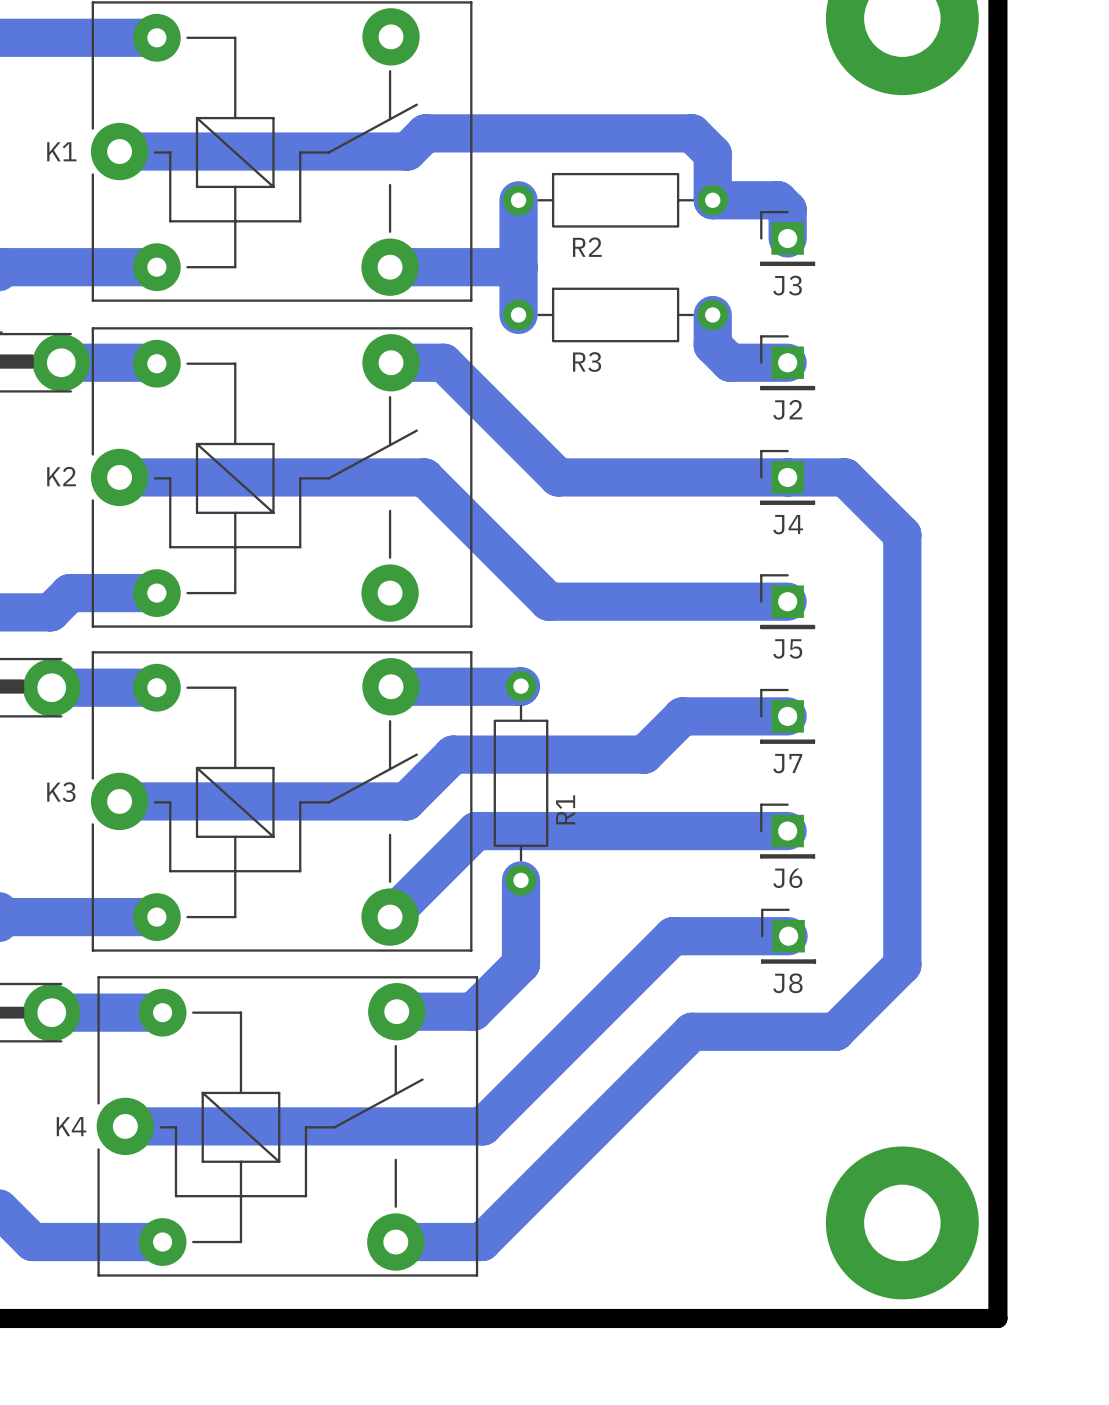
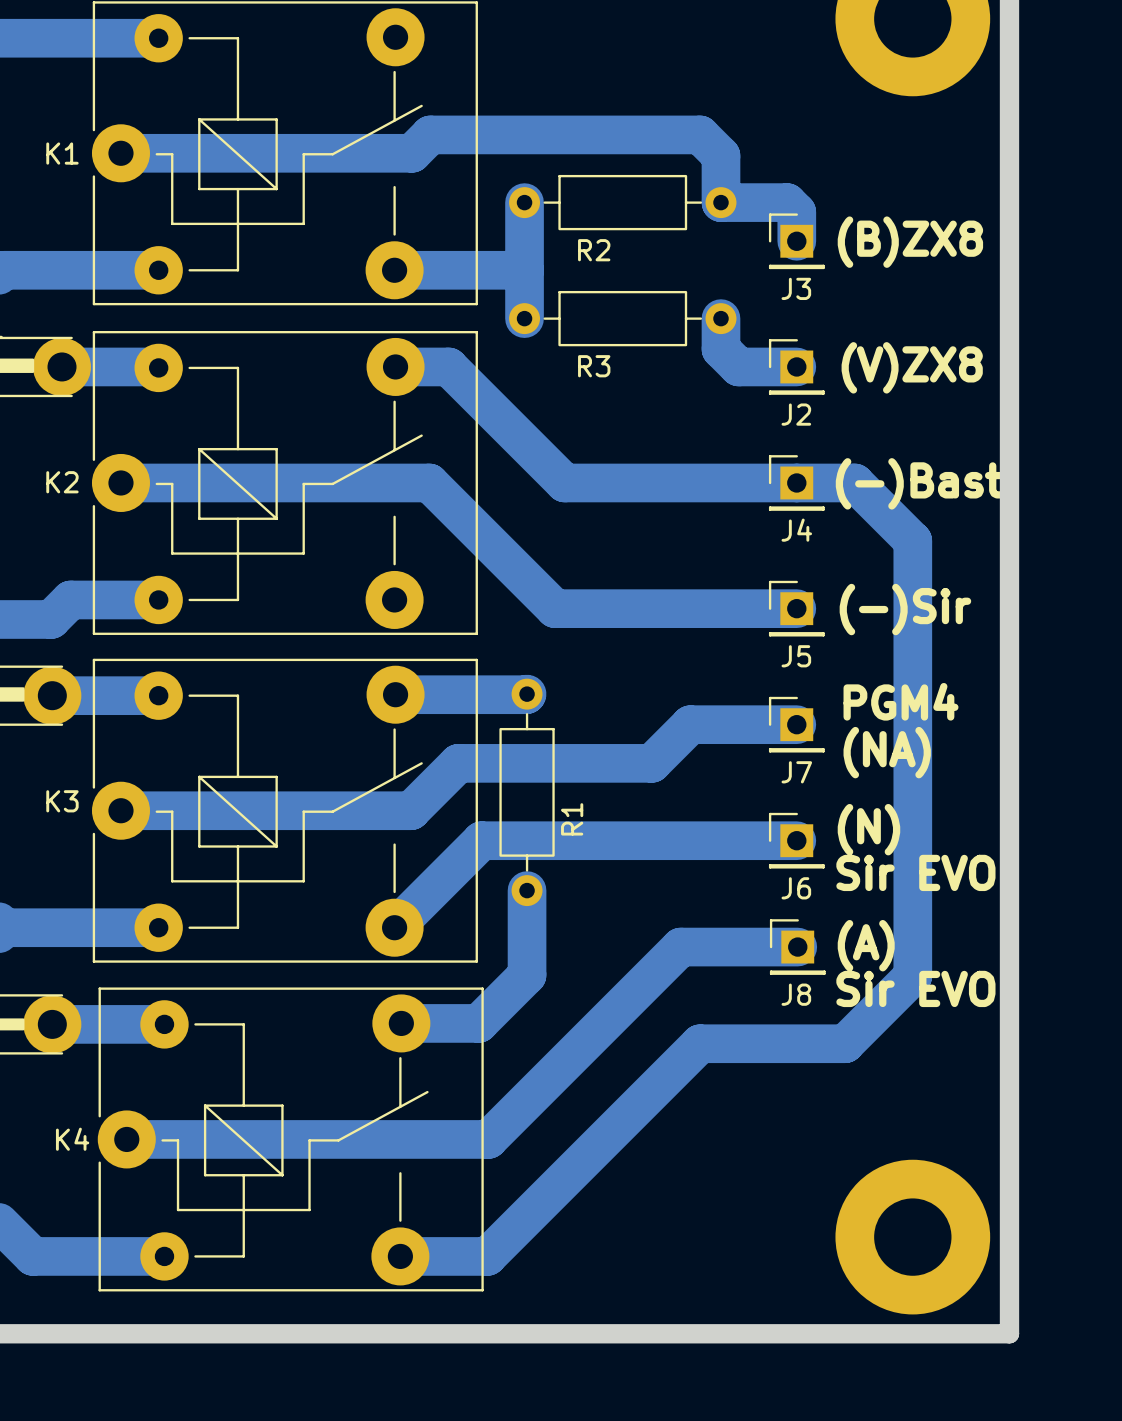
text: none -> (B)ZX8 (910, 242)
text: none -> (V)ZX8 (912, 367)
text: none -> (-)Bast (919, 483)
text: none -> (-)Sir (905, 609)
text: none -> PGM4 (901, 701)
text: none -> (NA) (887, 752)
text: none -> (N) (868, 829)
text: none -> Sir EVO (915, 872)
text: none -> (A) (866, 945)
text: none -> Sir EVO (915, 988)

